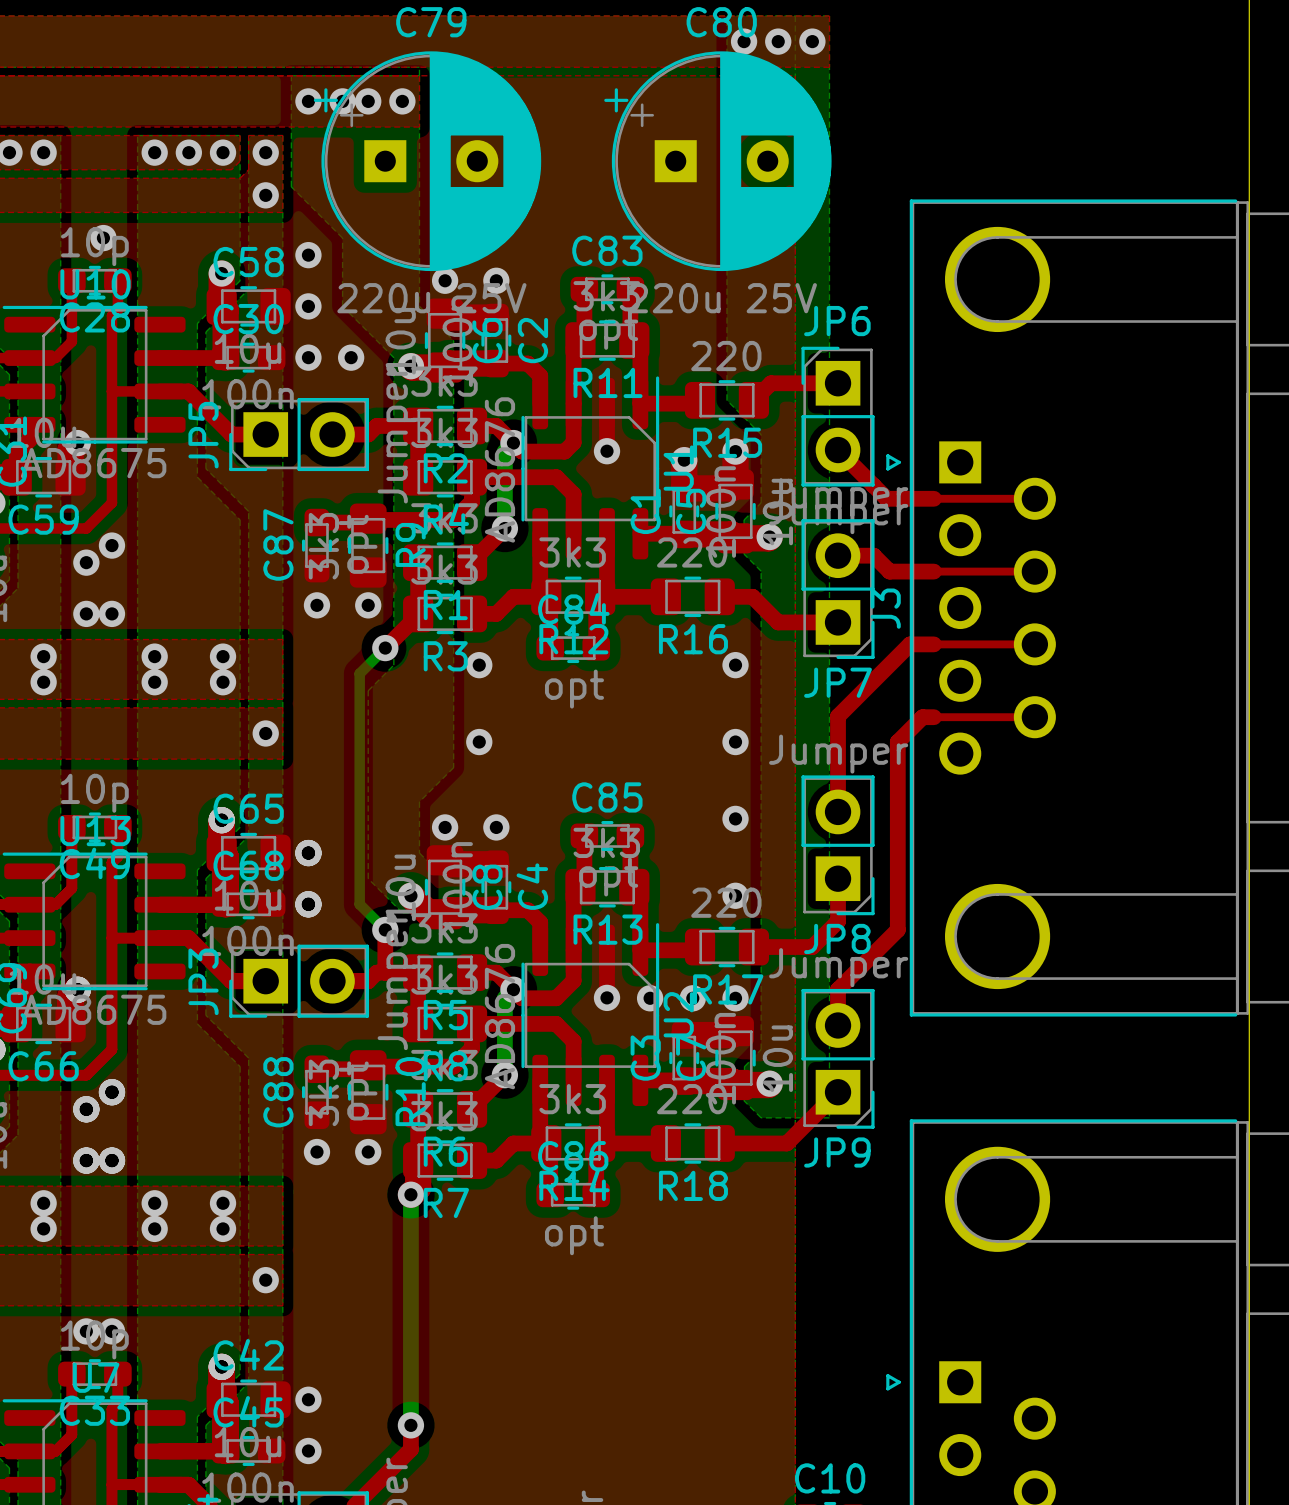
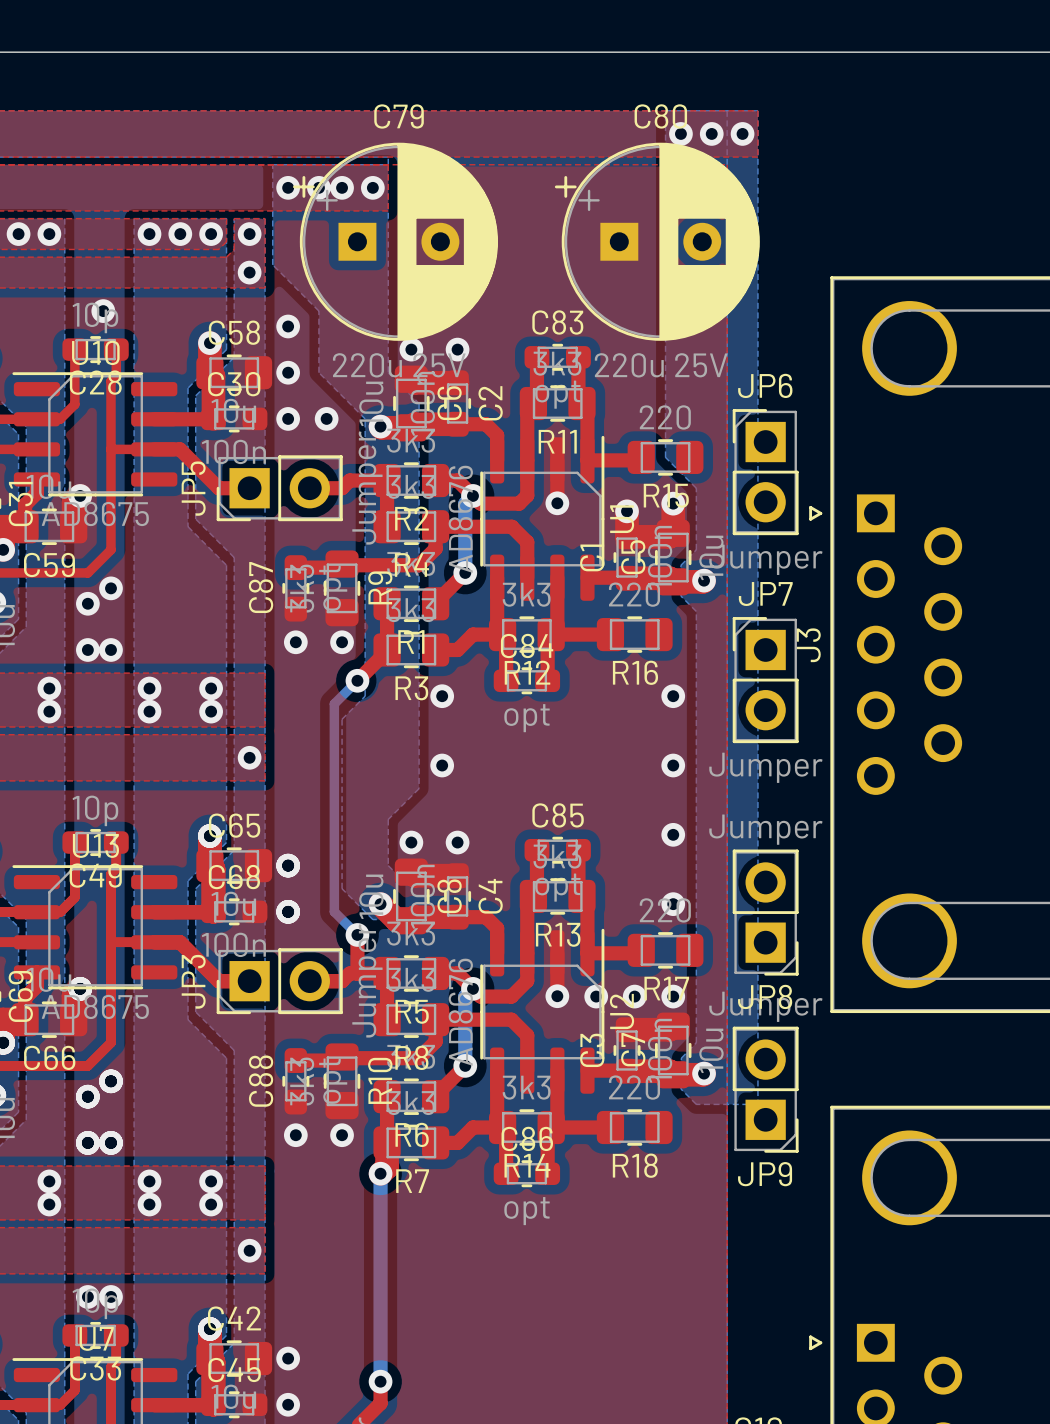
top track: (838, 383) (771, 383) (753, 400) -> none
top track: (838, 450) (886, 498) (1034, 498) -> none
top track: (838, 555) (873, 555) (889, 571) (1034, 571) -> none
JP7 rotation: 0° (838, 589) -> 180° (765, 680)
top track: (719, 596) (752, 596) (778, 622) (838, 622) -> none
top track: (1034, 644) (910, 644) (838, 716) (838, 811) -> none
top track: (1034, 717) (922, 717) (897, 742) (897, 929) (838, 989) (838, 1025) -> none
JP8 position: (838, 845) -> (765, 912)
top track: (838, 878) (838, 921) (812, 947) (753, 947) -> none
JP9 position: (838, 1058) -> (765, 1089)
top track: (838, 1092) (786, 1143) (719, 1143) -> none

